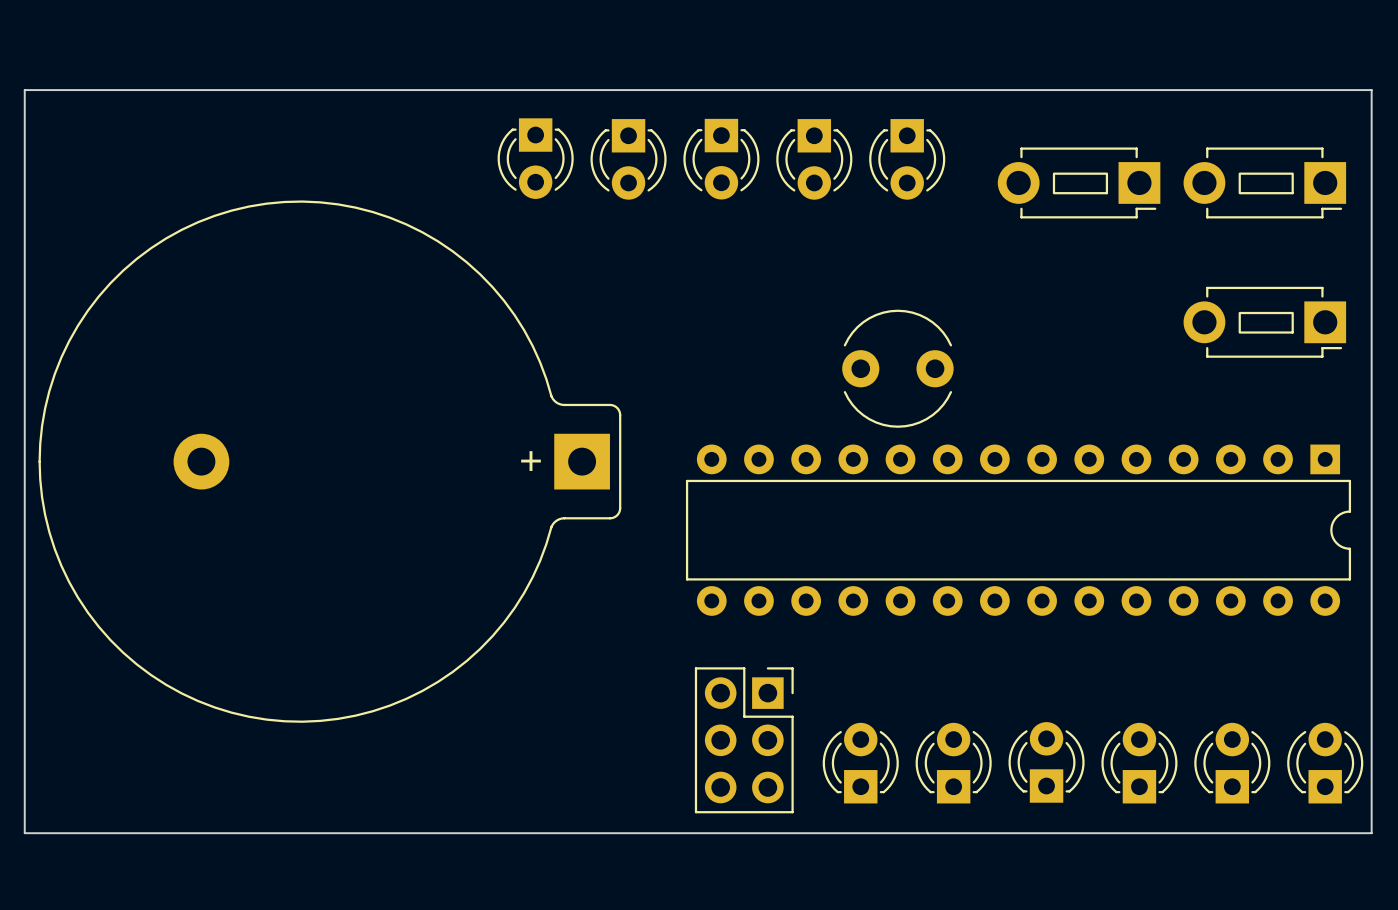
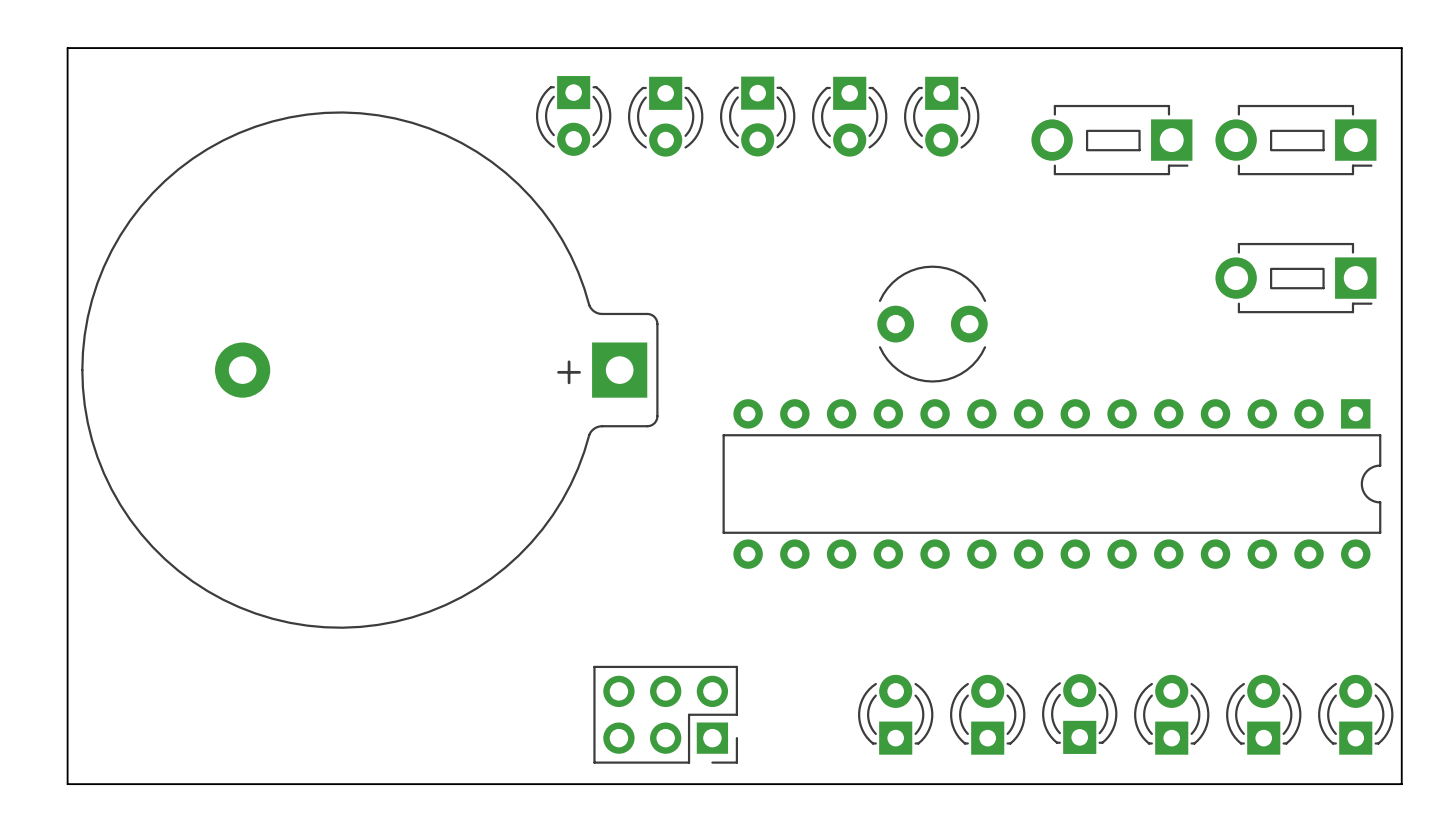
part position: (329, 461) -> (369, 370)
part rotation: 0° (744, 740) -> 90° clockwise (665, 714)
part position: (744, 740) -> (665, 714)

